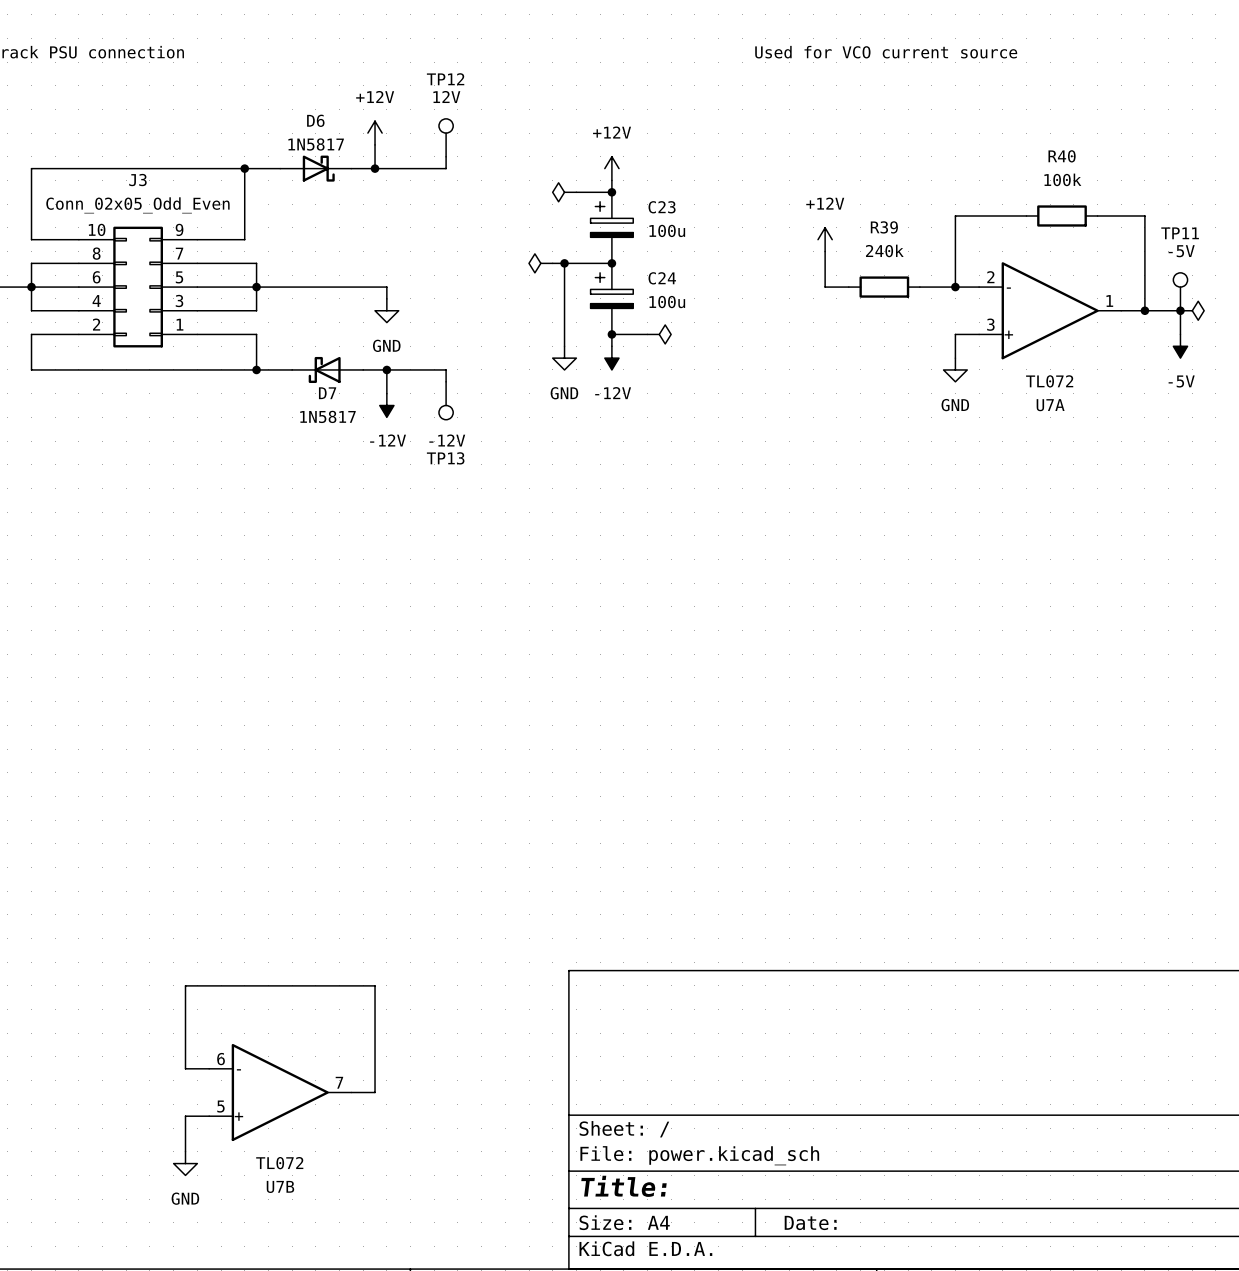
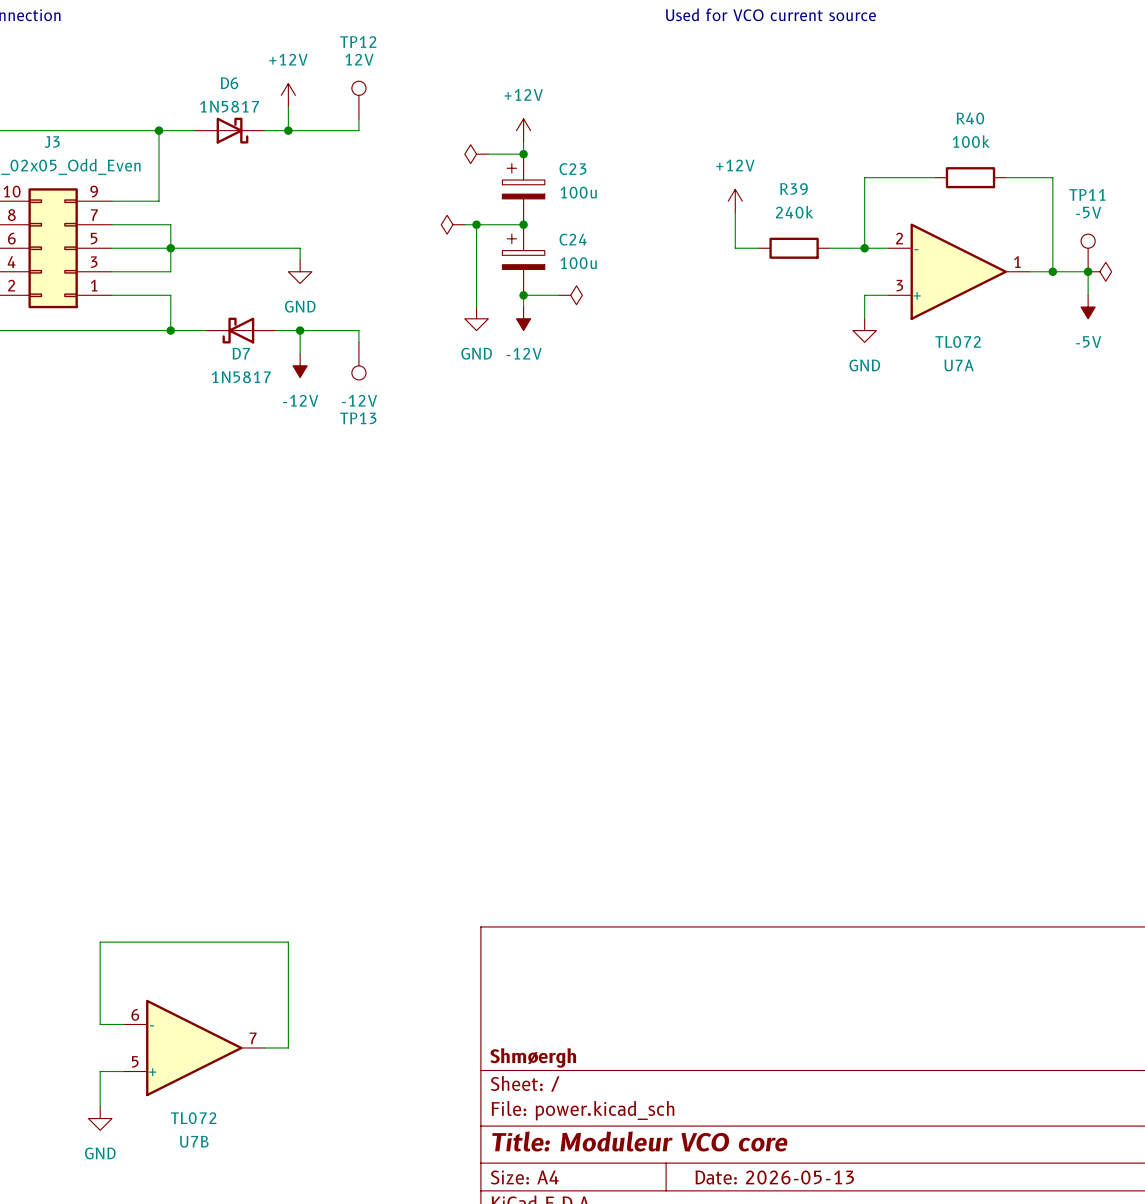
title block: none -> Shmøergh (533, 1057)
title block: Title: (623, 1186) -> Title: Moduleur VCO core (639, 1141)
title block: Date: (810, 1222) -> Date: 2026-05-13 (774, 1177)

